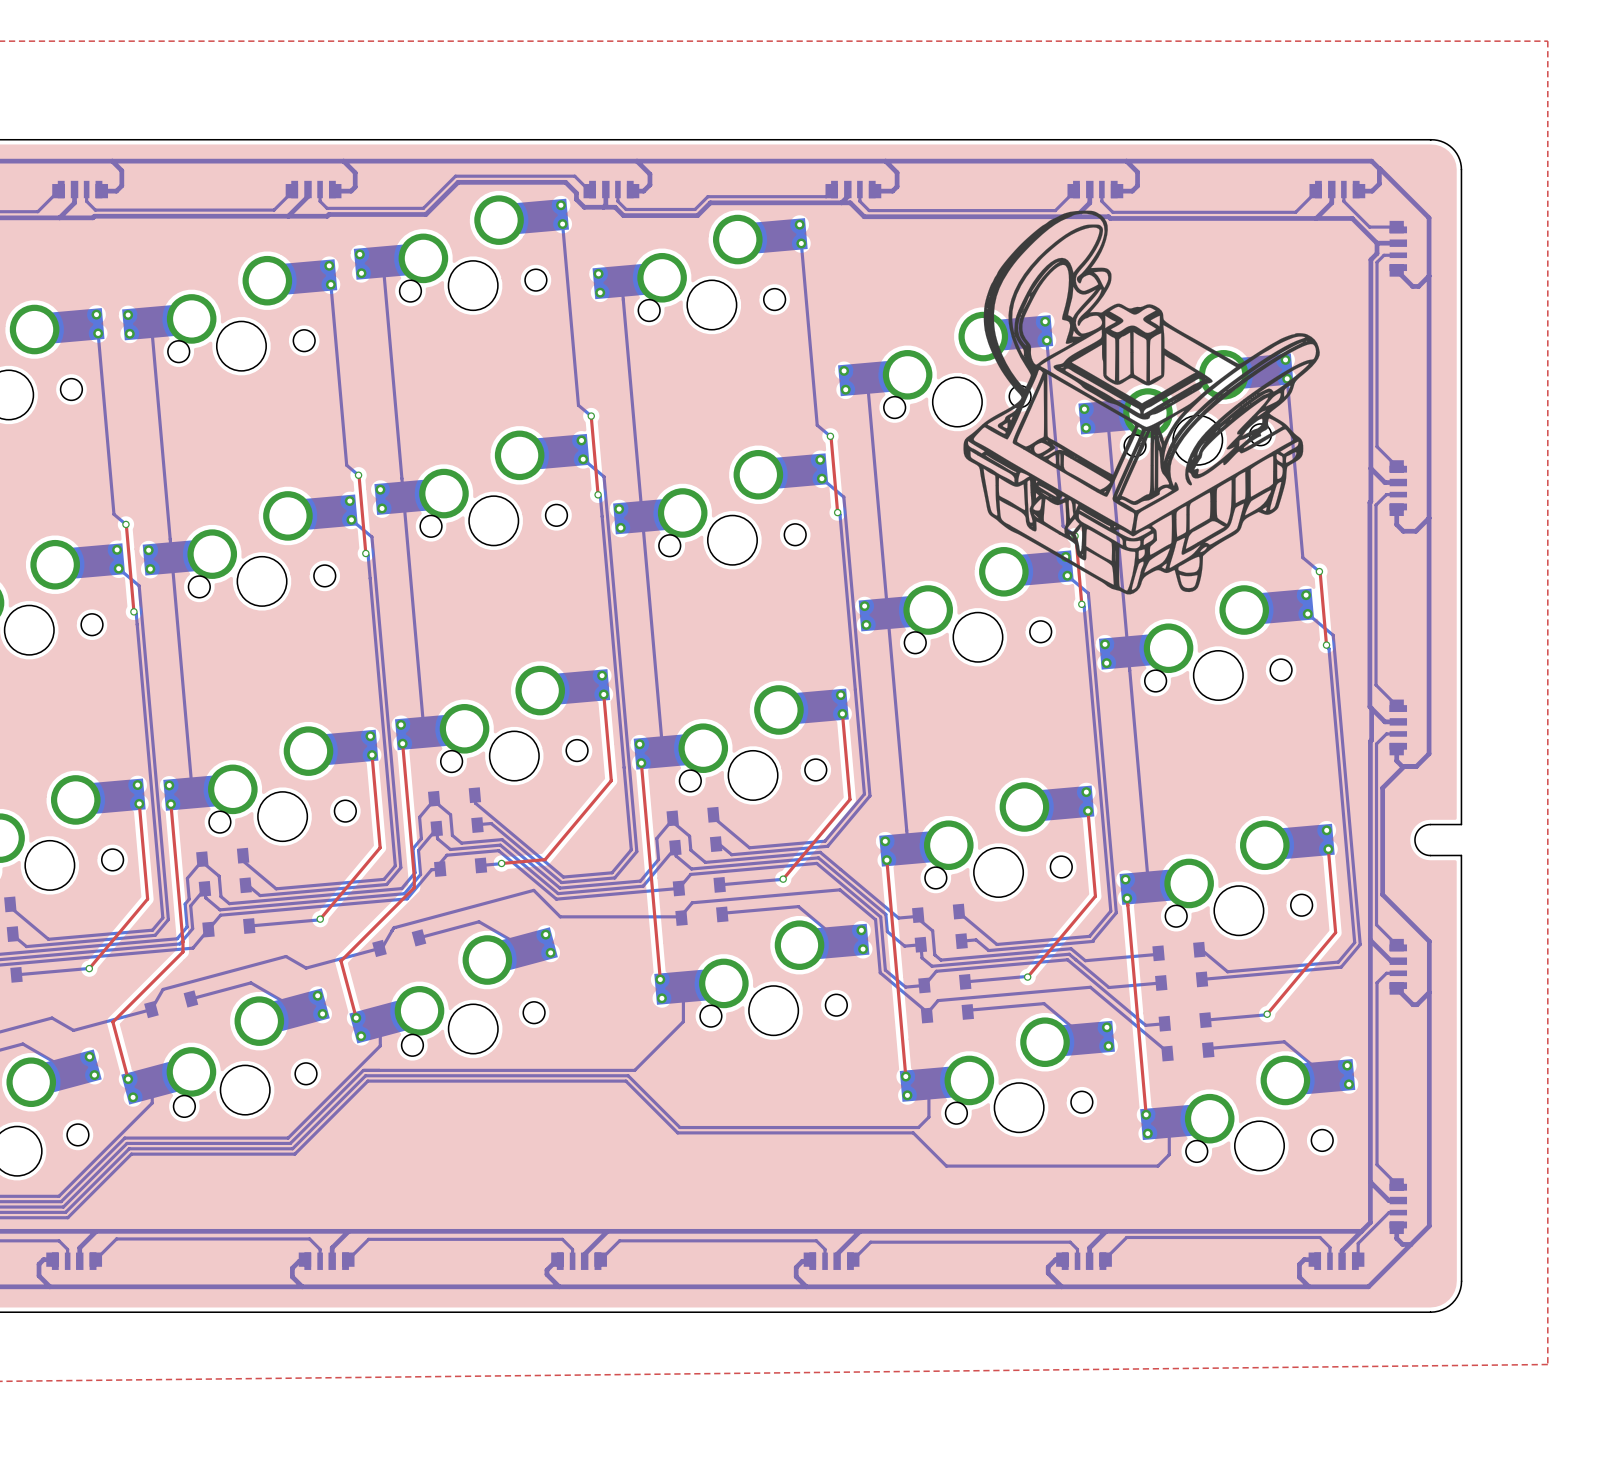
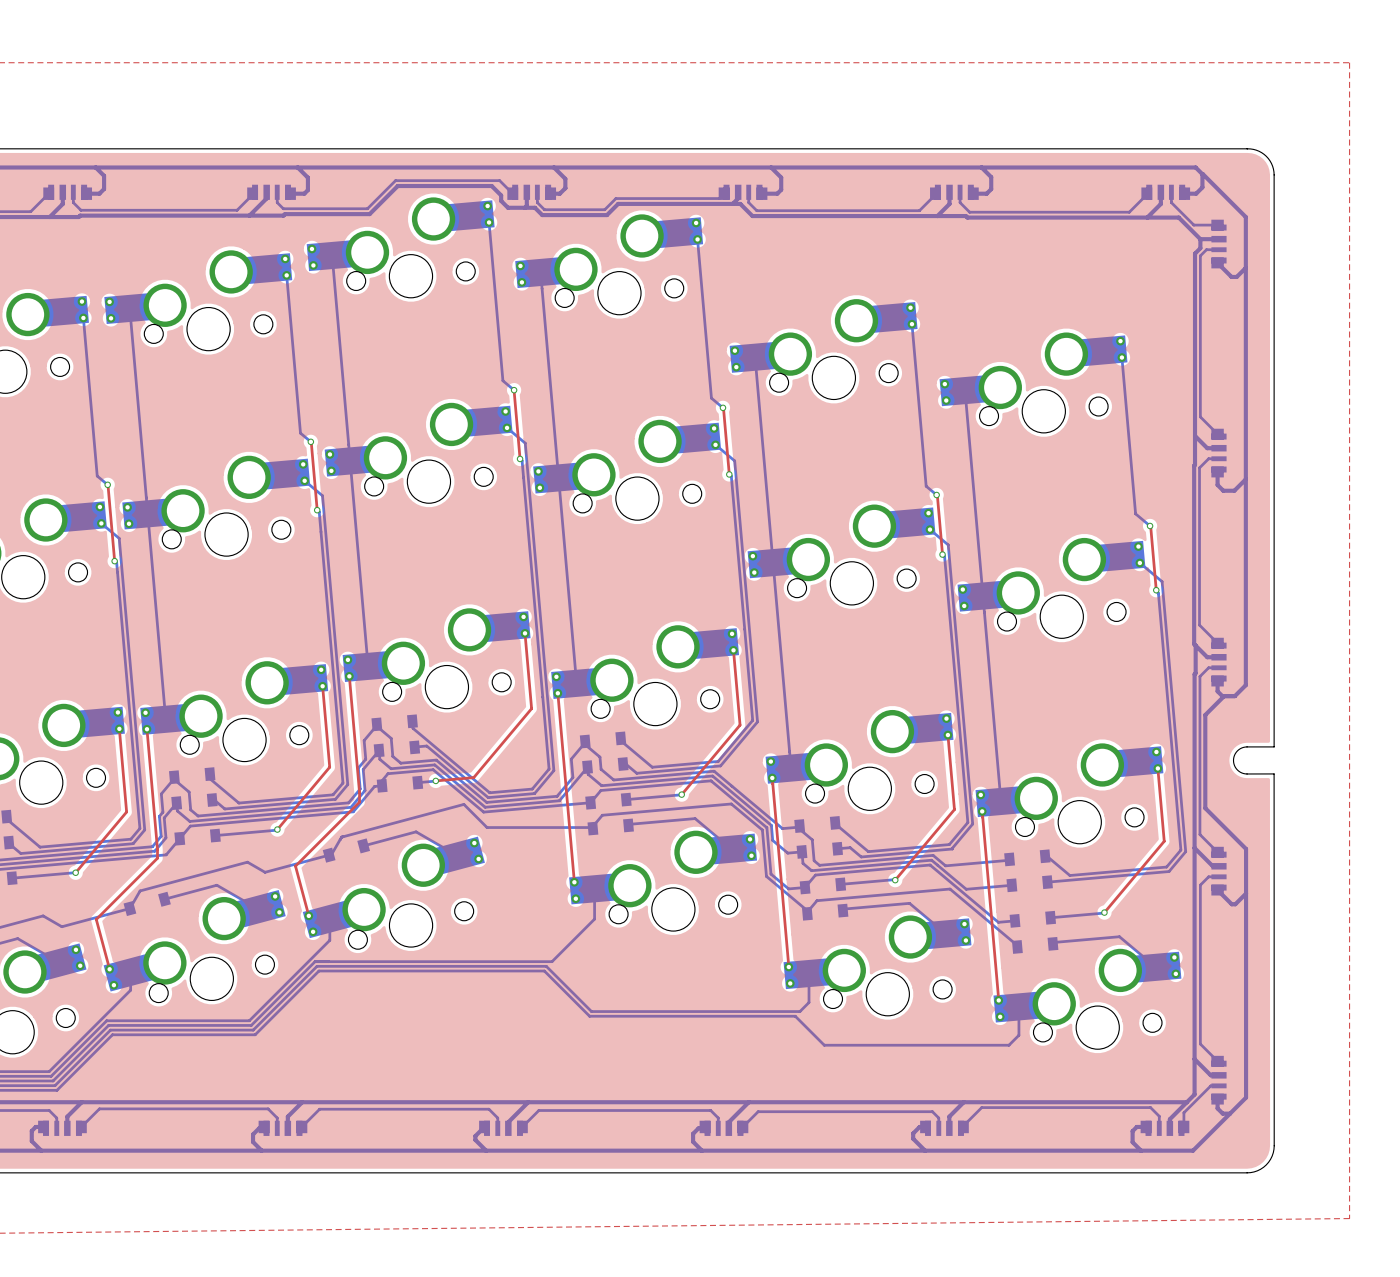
drawing: [963, 210, 1320, 595] -> none

